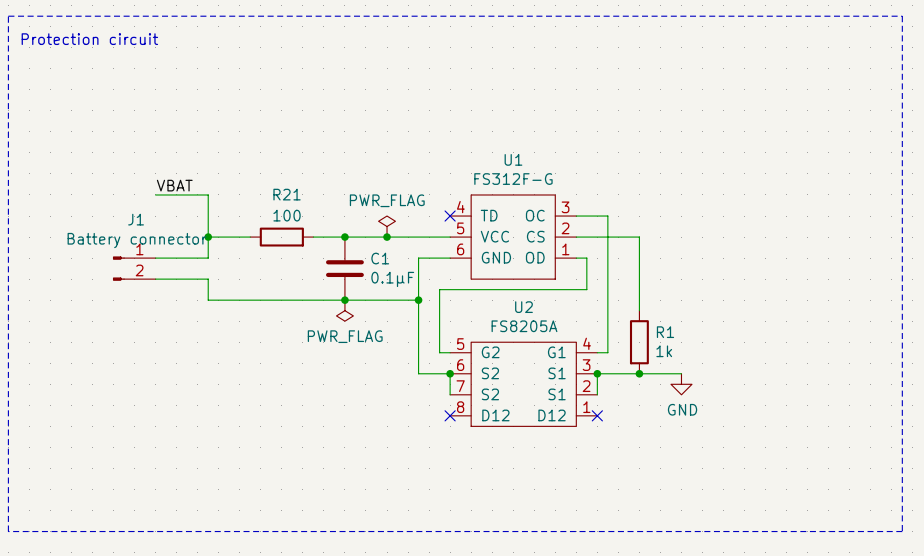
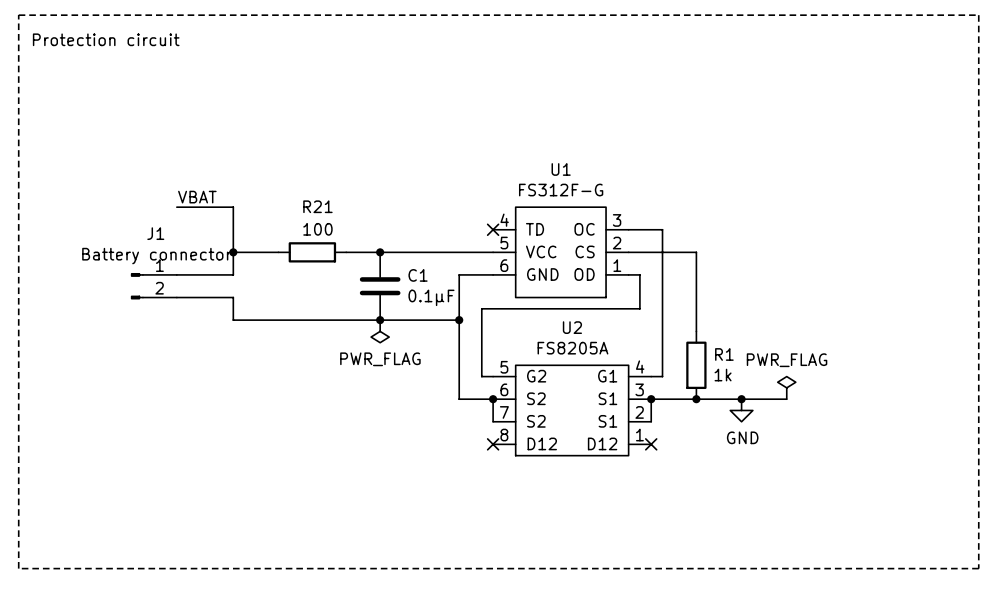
power symbol: PWR_FLAG (387, 226) -> none
junction: (387, 237) -> none
power symbol: none -> PWR_FLAG (786, 387)
wire: none -> (741, 399) (786, 399)
junction: none -> (741, 399)

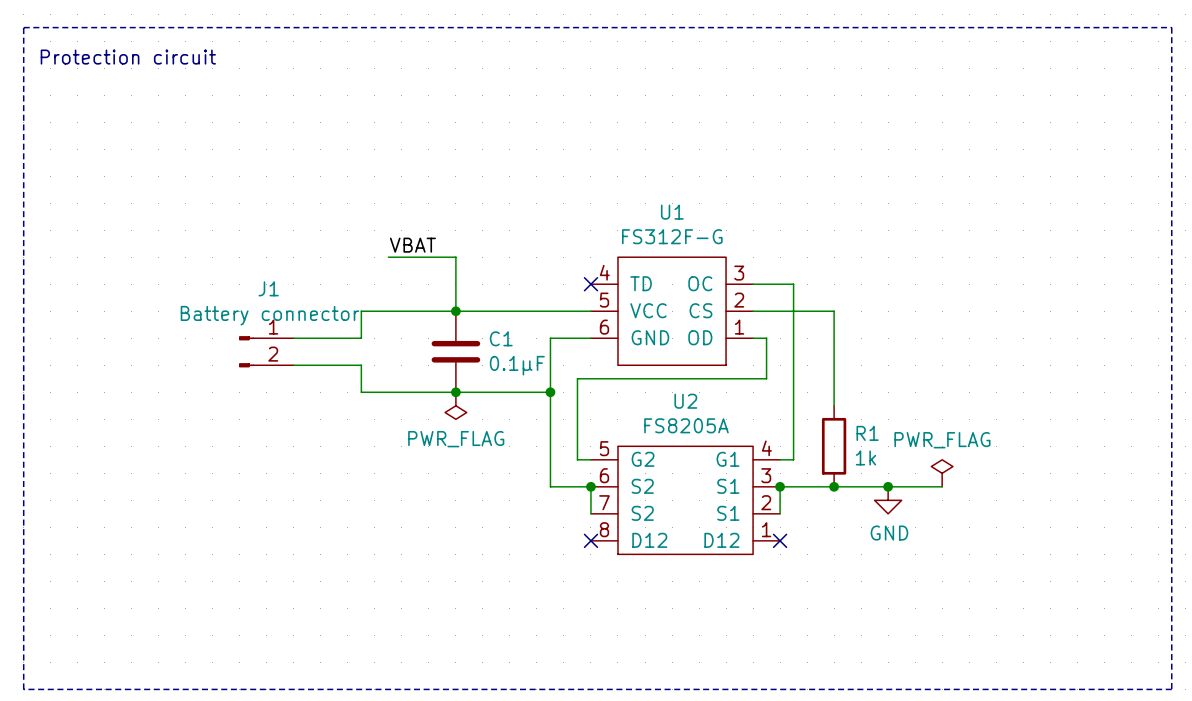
label position: VBAT (197, 197) -> VBAT (412, 245)
wire: (176, 207) (233, 207) (233, 274) (176, 274) -> none
wire: none -> (388, 257) (455, 257) (455, 311)
junction: (233, 252) -> none
R21: 100 (312, 252) -> none
wire: none -> (415, 311) (361, 311) (361, 338) (293, 338)
J1 position: (153, 286) -> (266, 351)
wire: (176, 297) (233, 297) (233, 320) (301, 320) -> (293, 365) (361, 365) (361, 392)

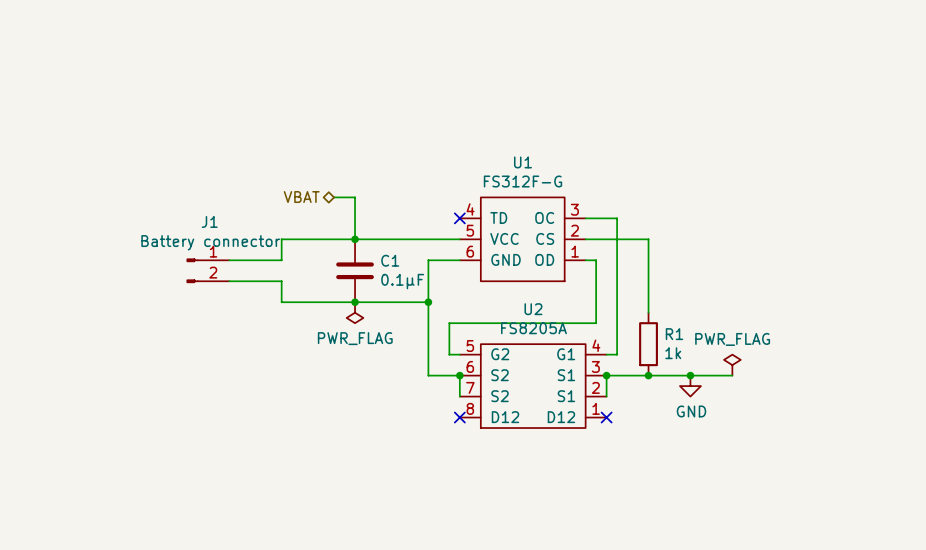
line: (23, 27) (23, 689) (1171, 689) (1171, 27) (23, 27) -> none
text: Protection circuit (128, 57) -> none
label: VBAT (412, 245) -> none
hierarchical label: none -> VBAT (301, 197)
wire: (388, 257) (428, 257) -> none
wire: (766, 378) (577, 378) (577, 419) -> (596, 291) (596, 323) (449, 323)

